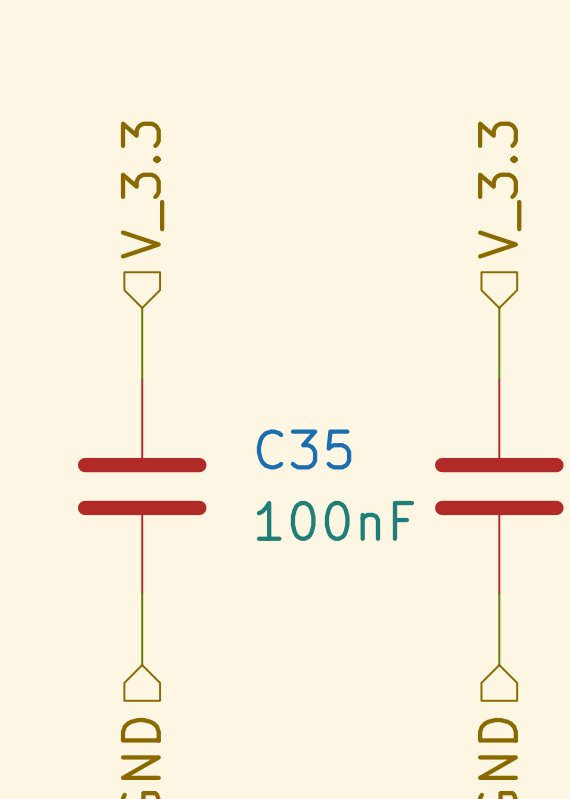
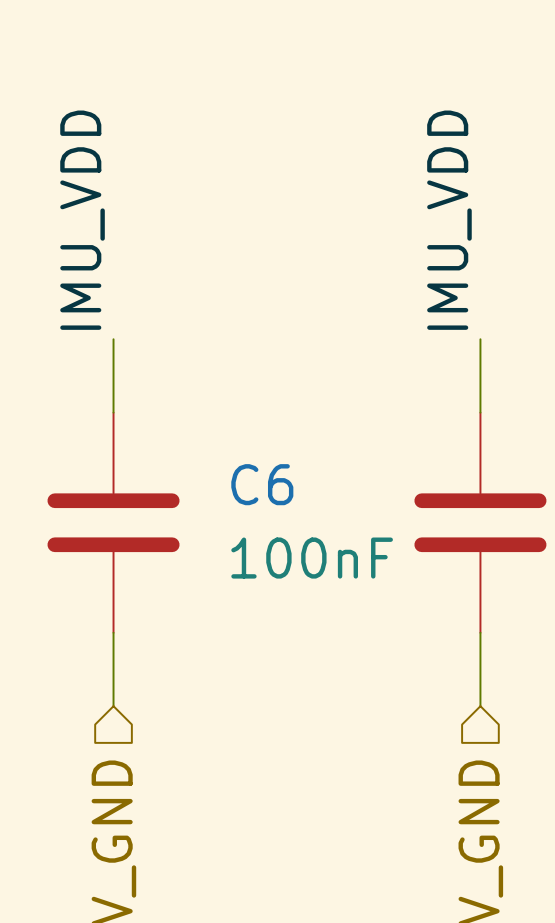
hierarchical label: V_3.3 (142, 190) -> none
hierarchical label: V_3.3 (499, 190) -> none
label: none -> IMU_VDD (82, 220)
label: none -> IMU_VDD (449, 220)
C35 name: C35 (304, 449) -> C6 (262, 484)

